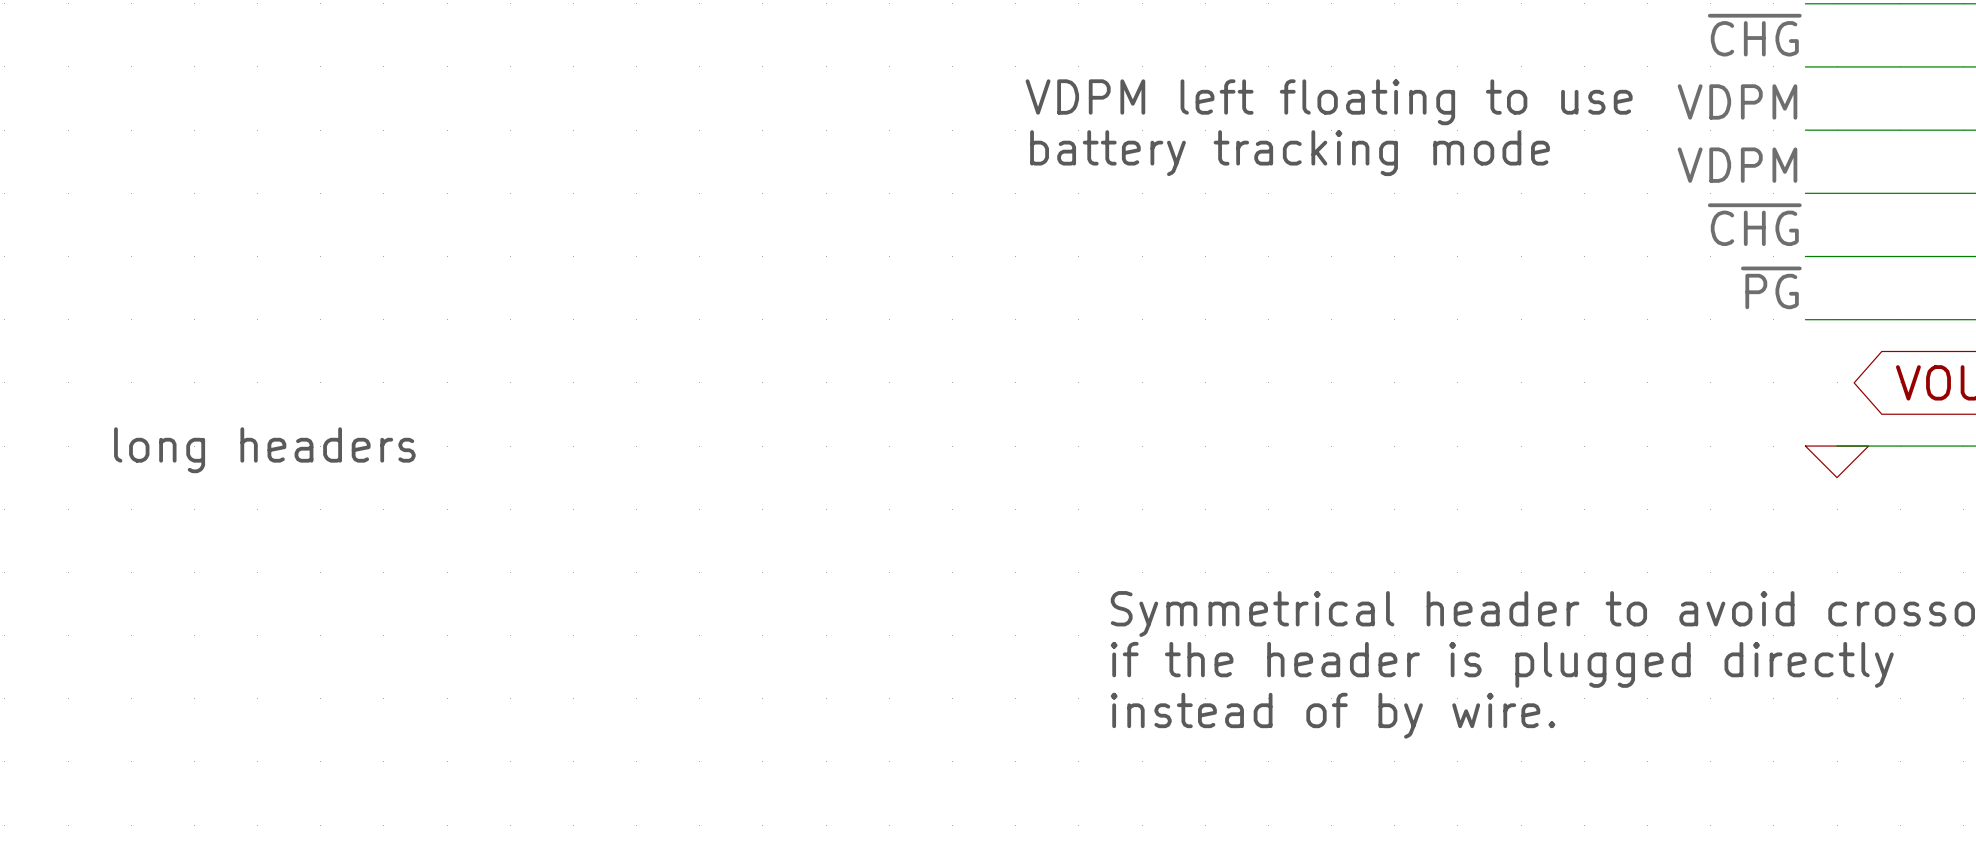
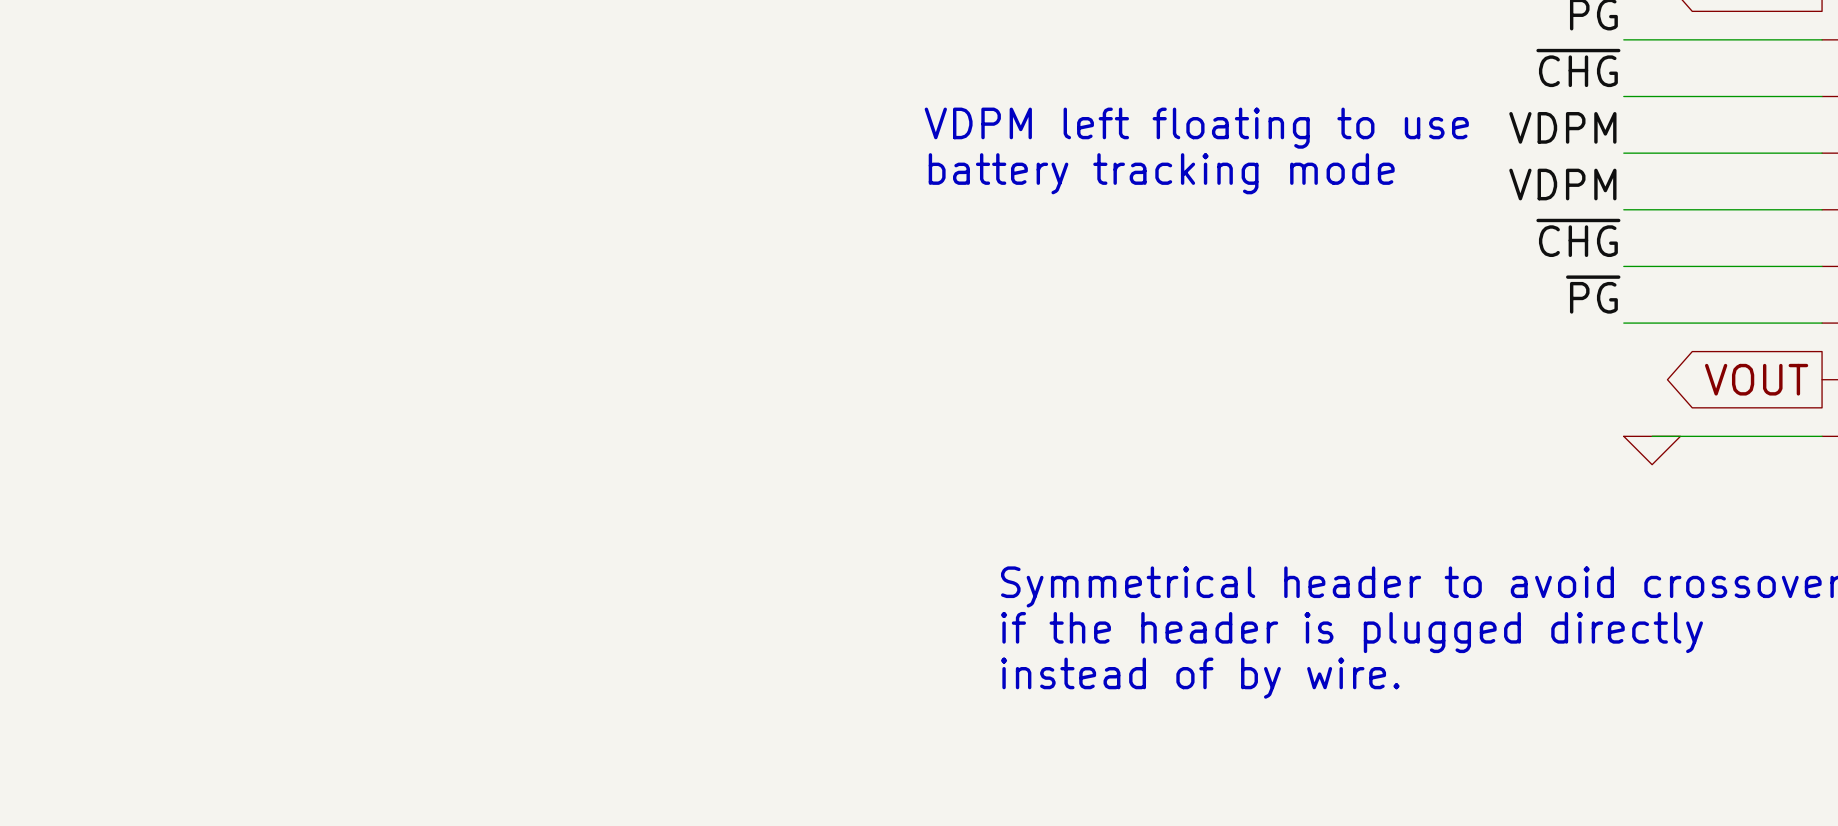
text: long headers (264, 450) -> none

